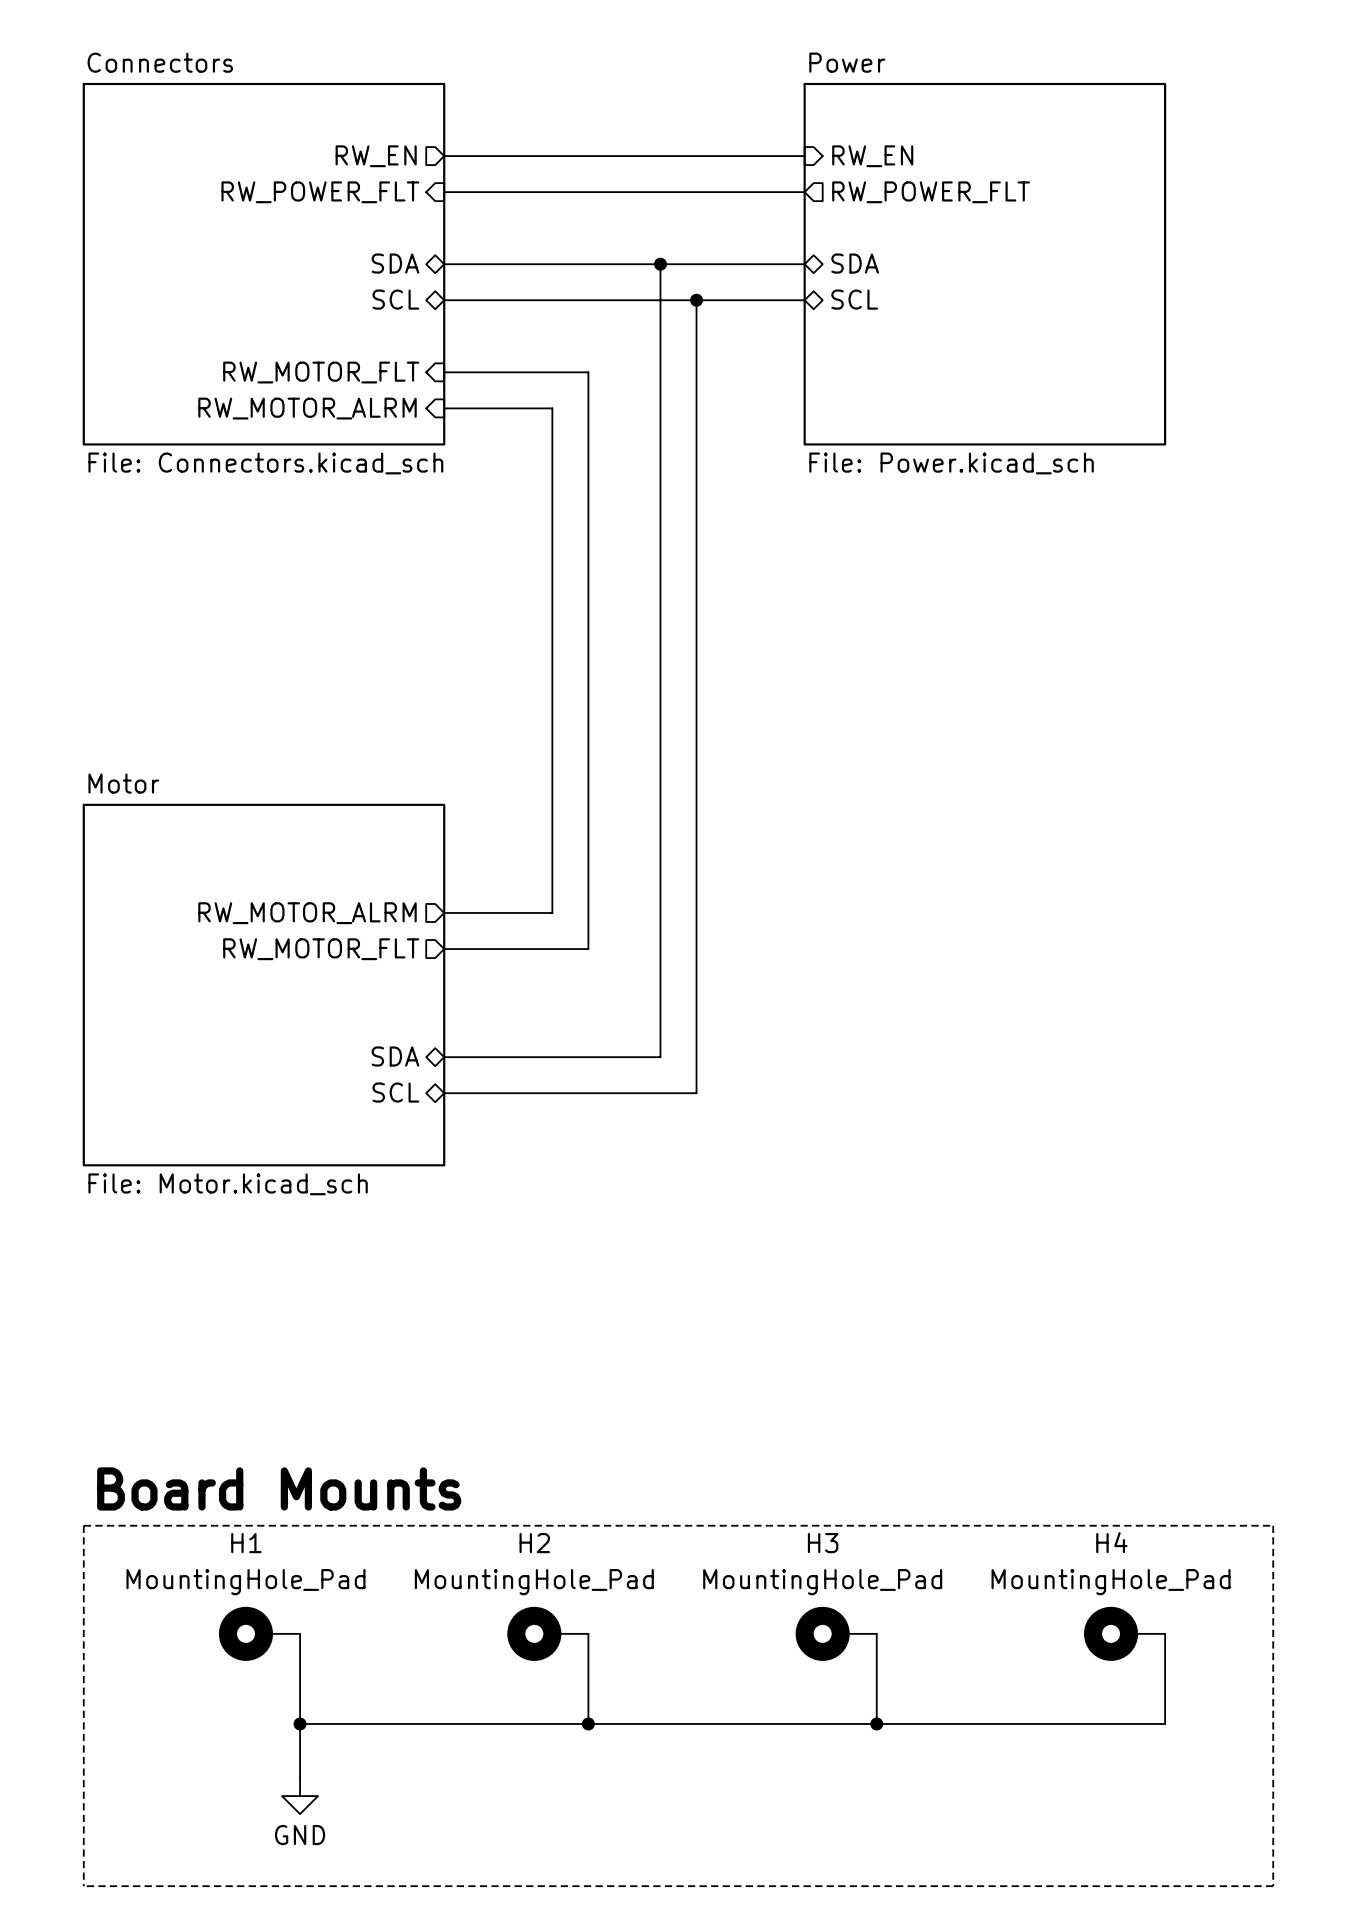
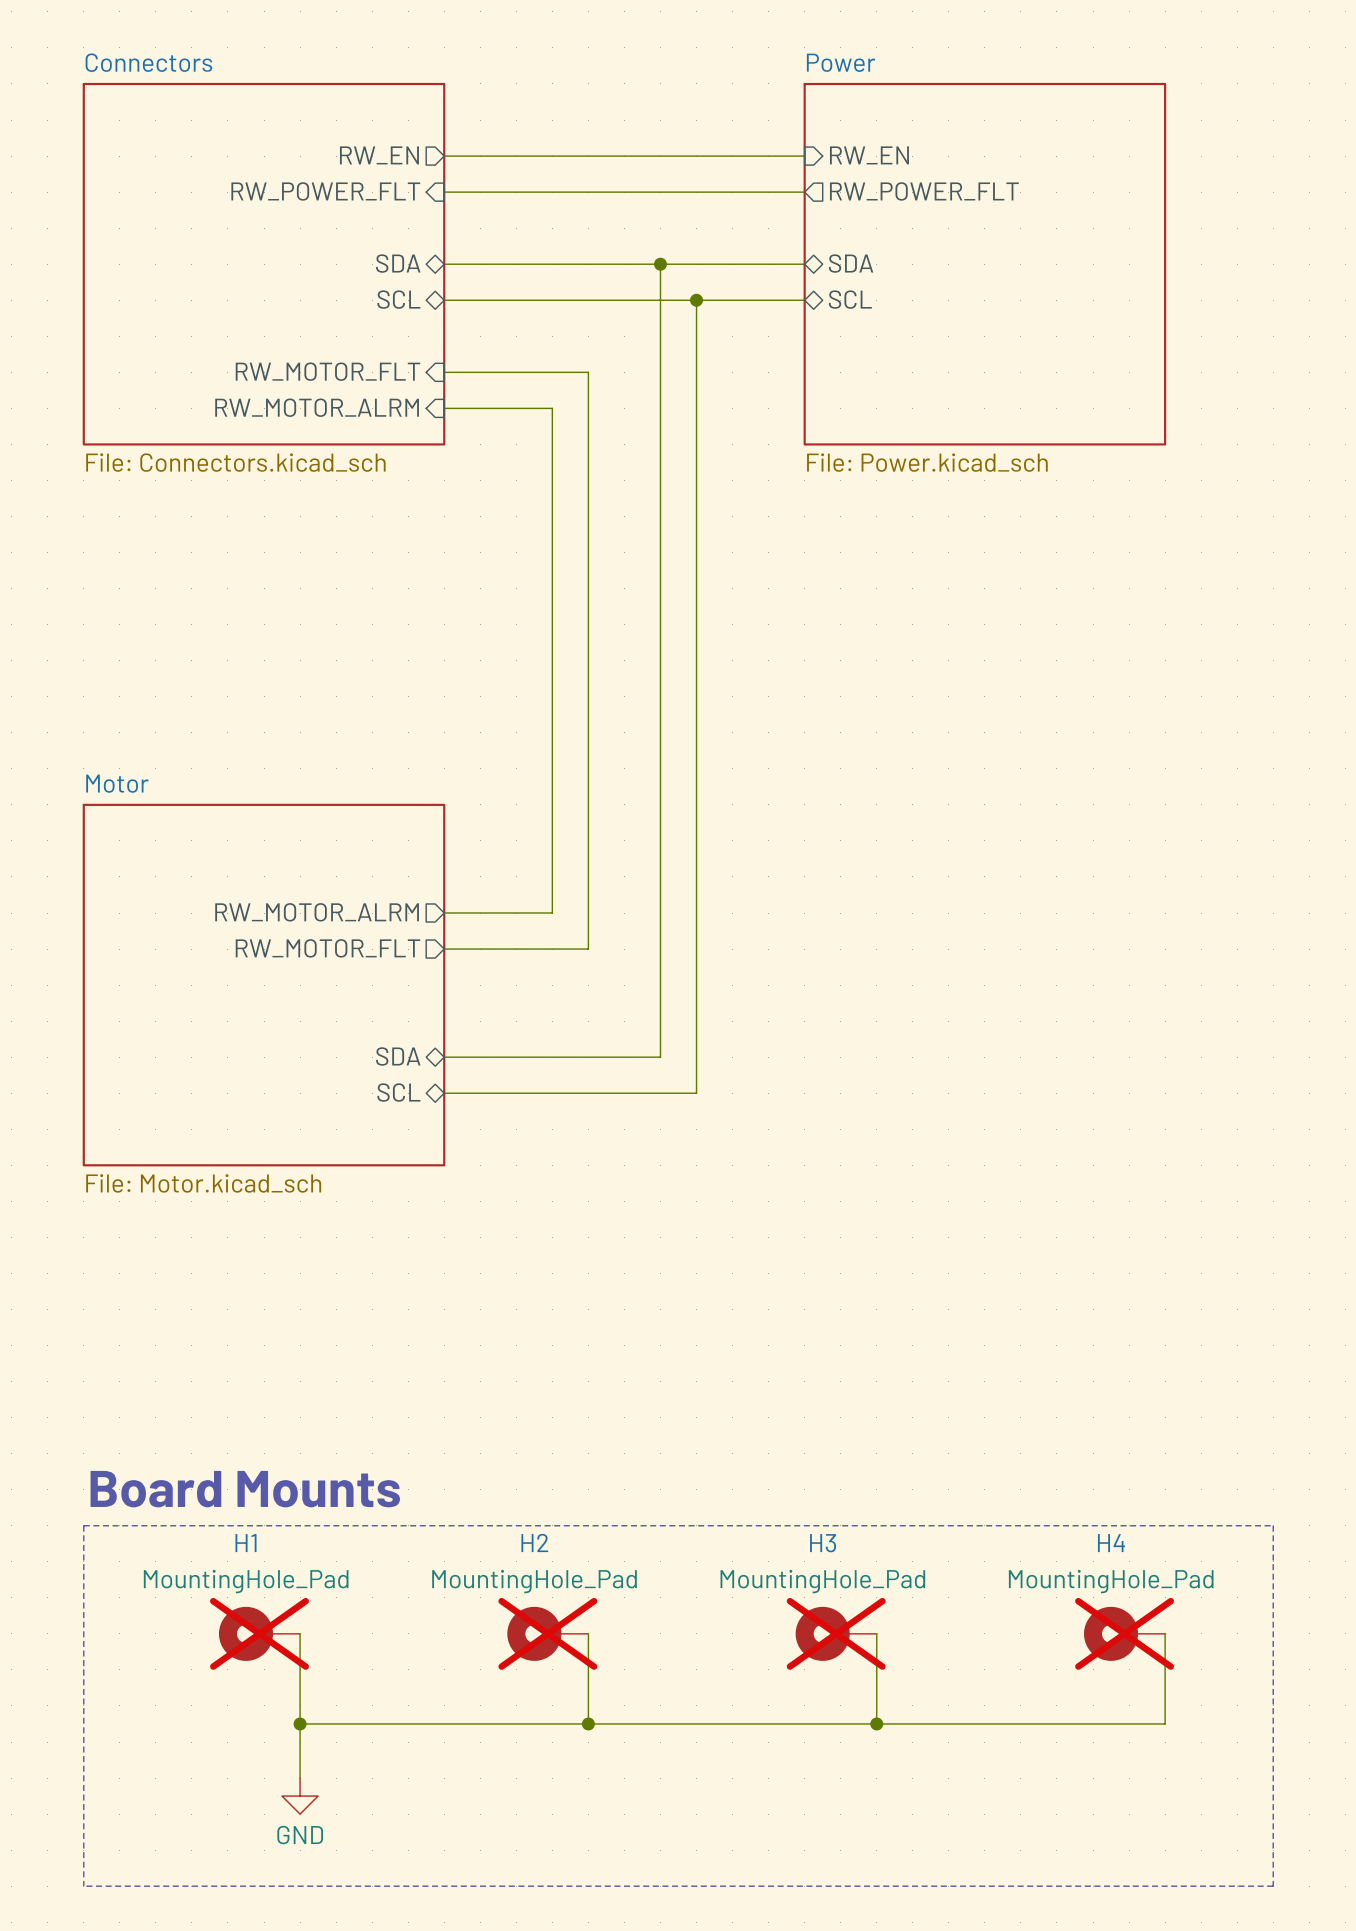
H1 do-not-place cross: none -> (259, 1633)
H2 do-not-place cross: none -> (547, 1633)
H3 do-not-place cross: none -> (836, 1633)
H4 do-not-place cross: none -> (1124, 1633)

